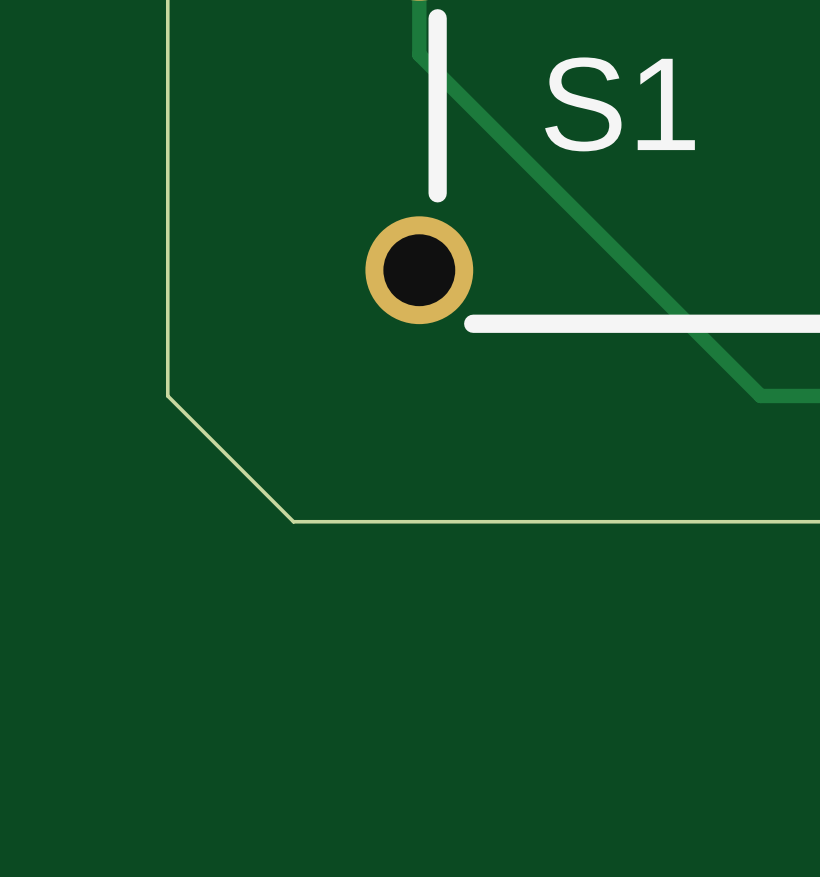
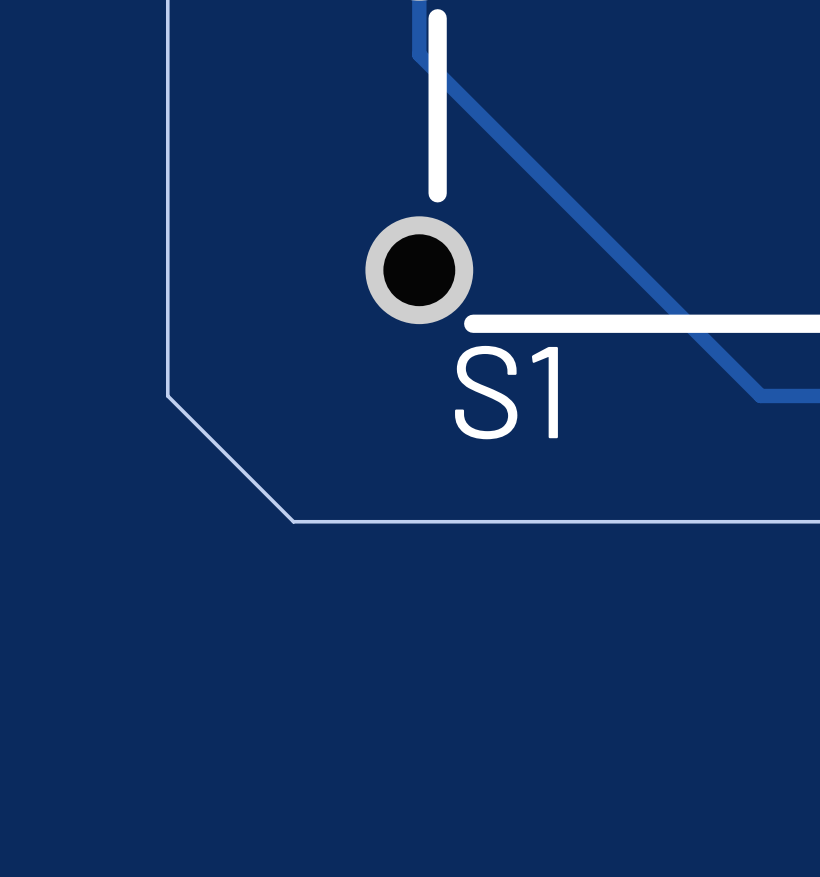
S1 name position: S1 (620, 104) -> S1 (506, 392)

